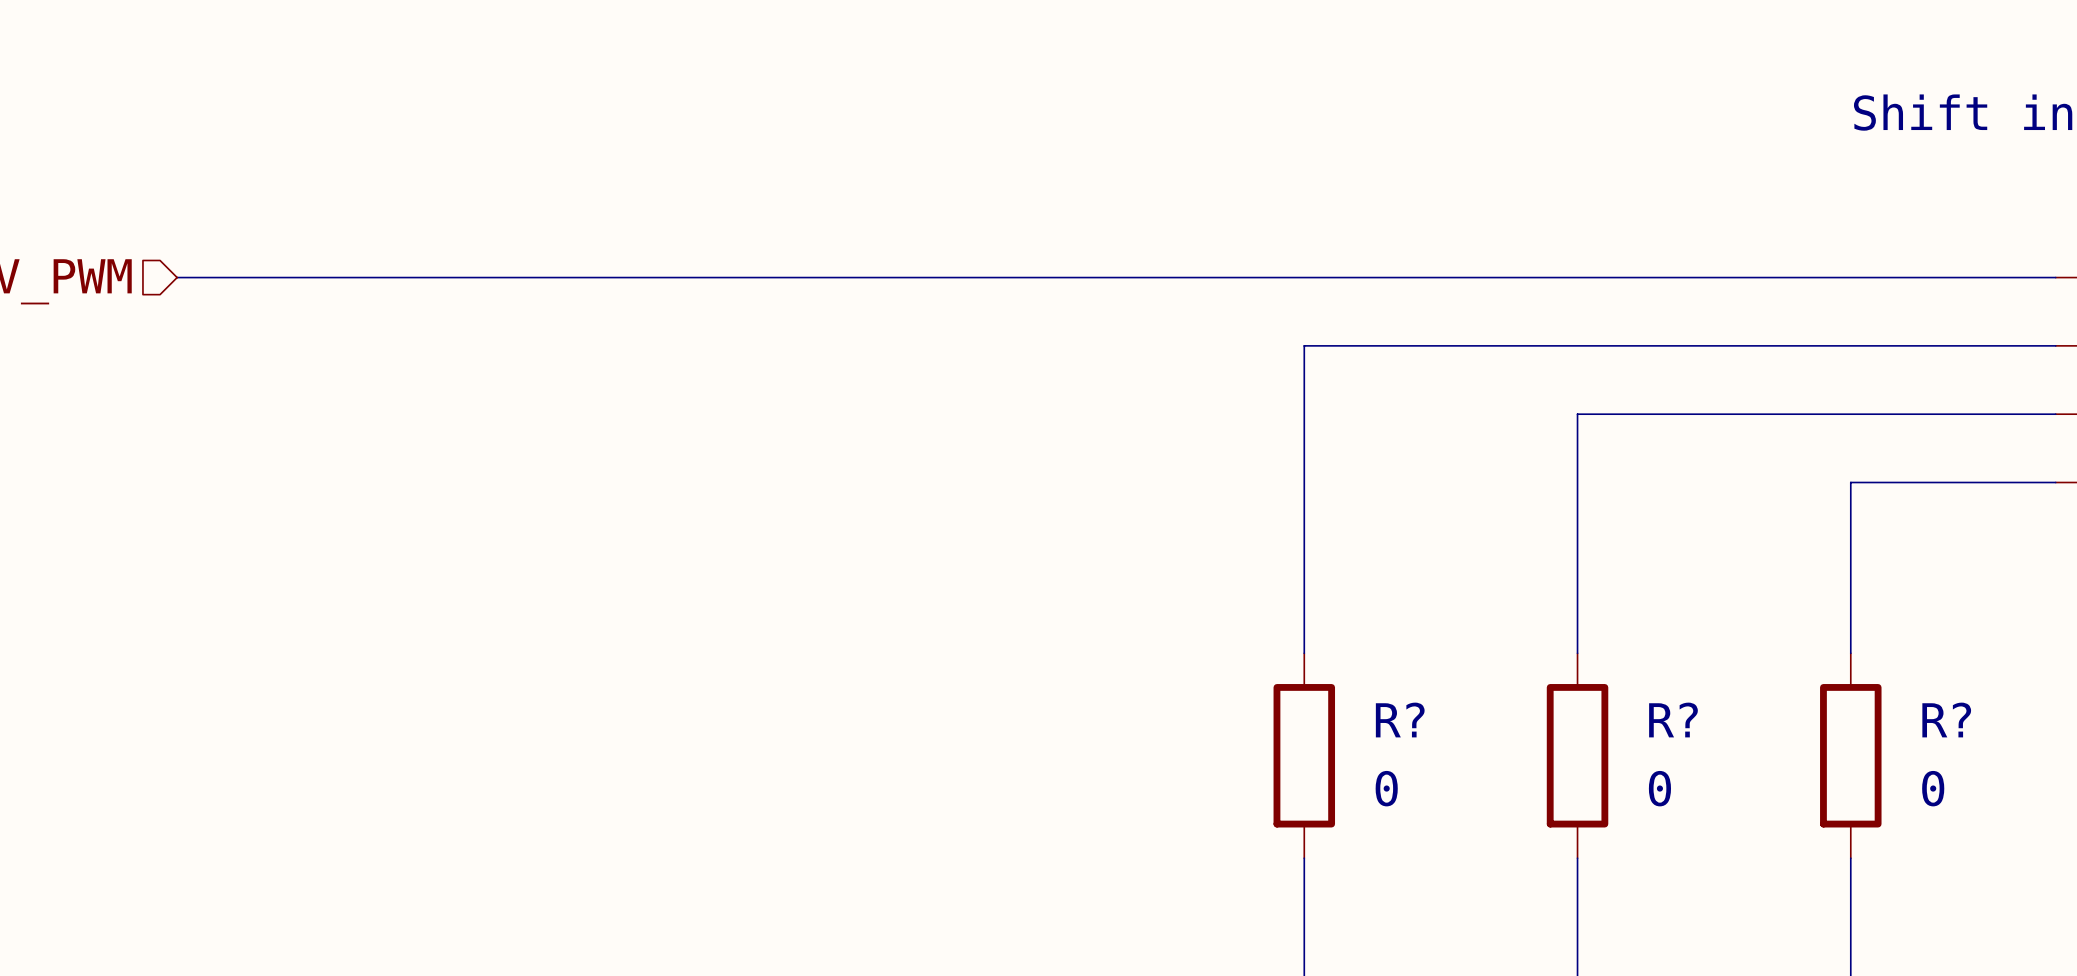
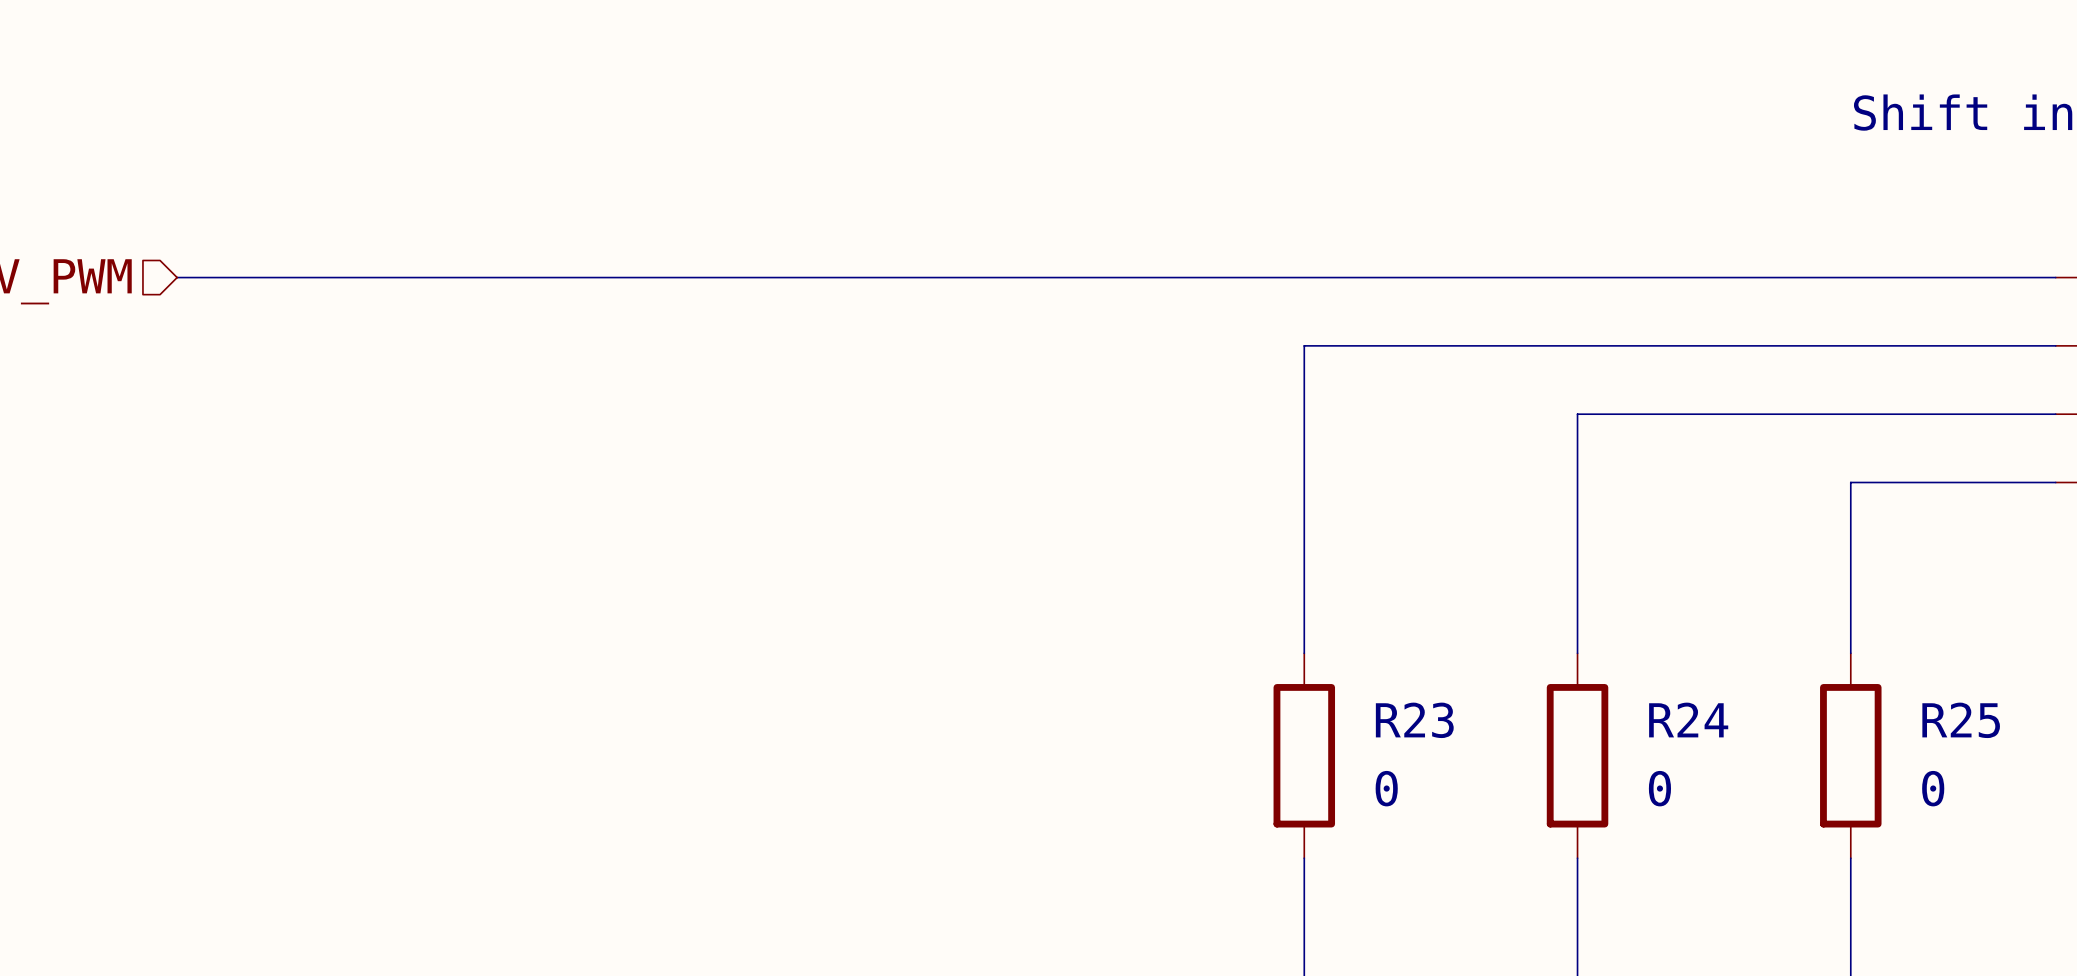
R? name: R? (1400, 720) -> R23 (1414, 720)
R? name: R? (1673, 720) -> R24 (1688, 720)
R? name: R? (1946, 720) -> R25 (1961, 720)

